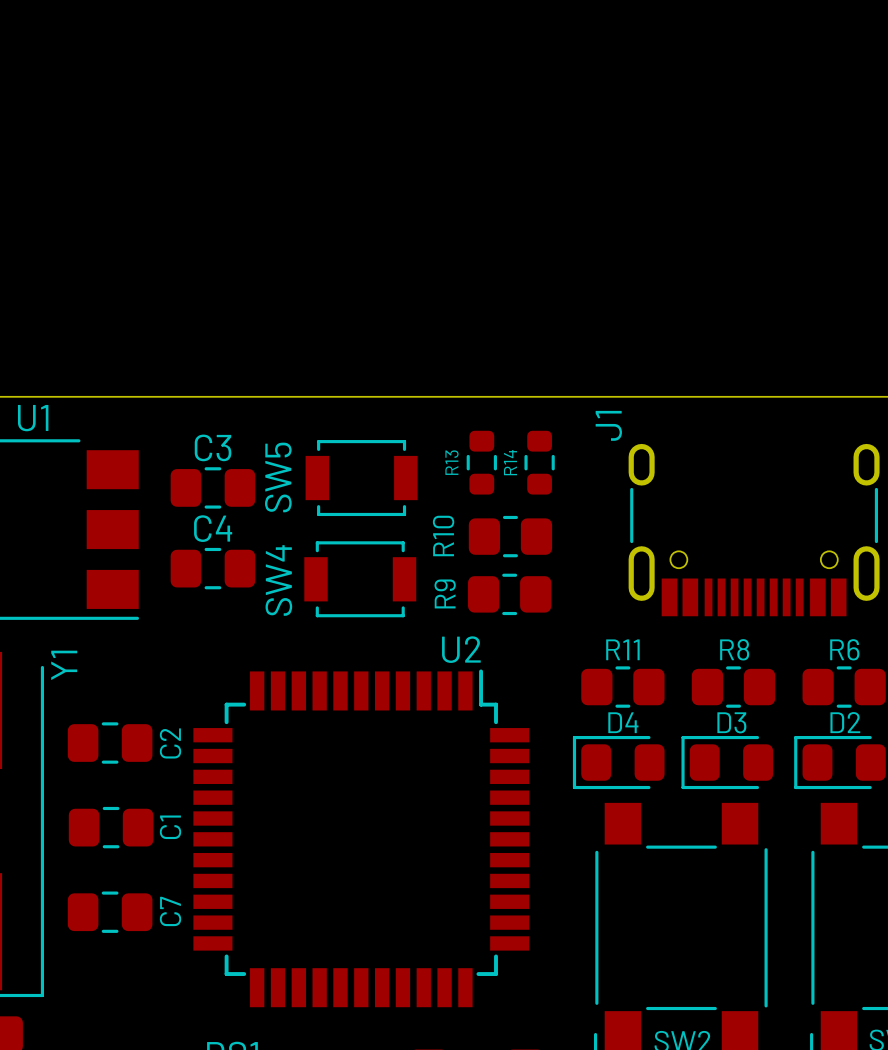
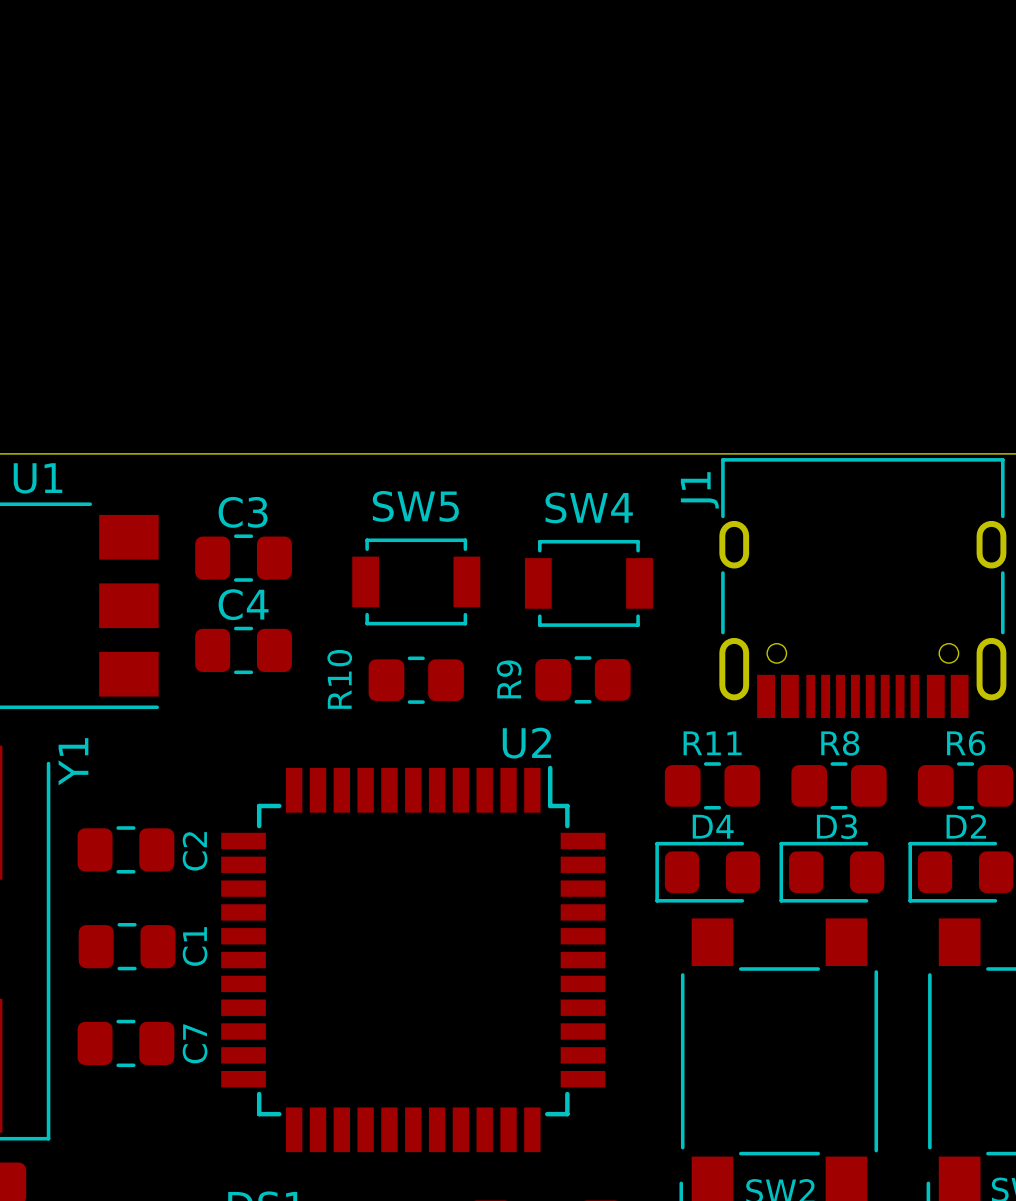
J1 footprint: [628, 443, 880, 617] -> [719, 458, 1007, 719]
R13: (481, 462) -> none
R14: (539, 462) -> none
SW5 name rotation: 0° (278, 477) -> 90° clockwise (415, 506)
SW5 position: (361, 478) -> (416, 581)
R10 position: (510, 536) -> (416, 680)
SW4 position: (360, 579) -> (588, 583)
SW4 name rotation: 0° (278, 580) -> 90° clockwise (589, 507)
SW4 name position: SW4 (278, 580) -> SW4 (589, 507)

